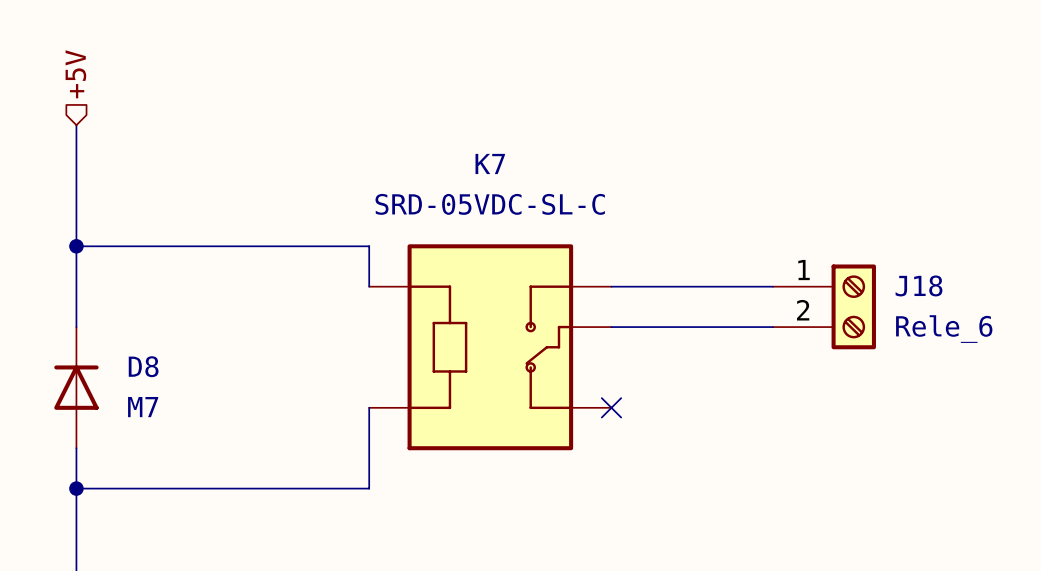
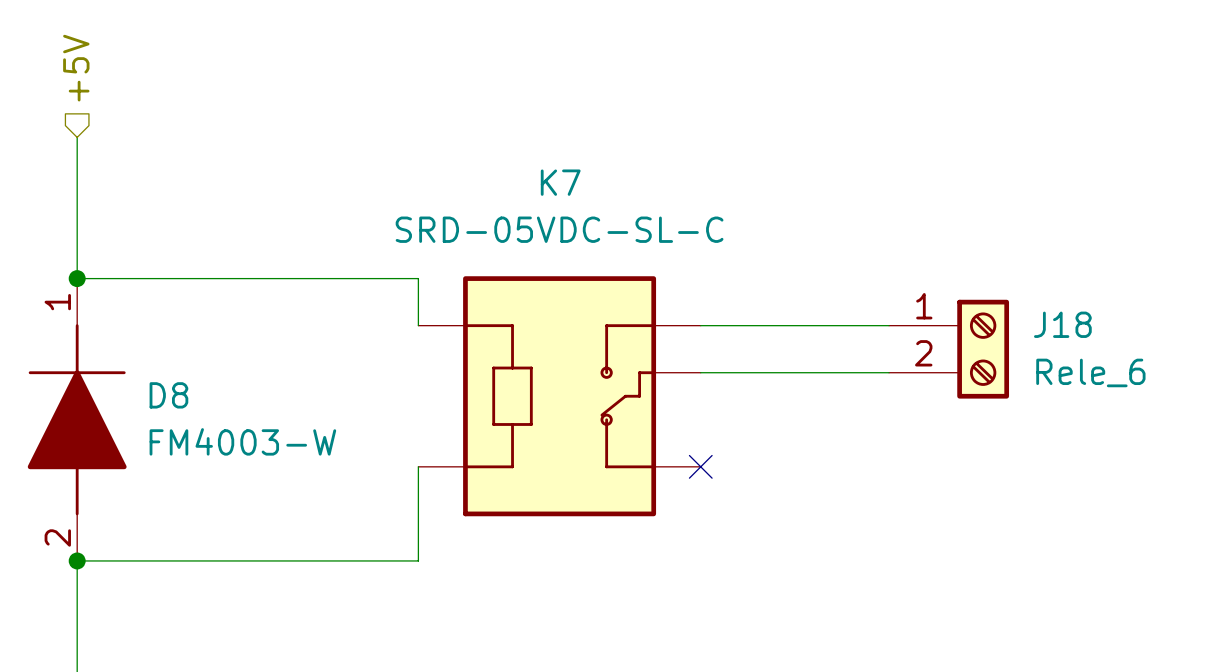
D8 symbol: [54, 327, 99, 449] -> [27, 278, 127, 561]
D8 value: M7 (143, 407) -> FM4003-W (242, 441)

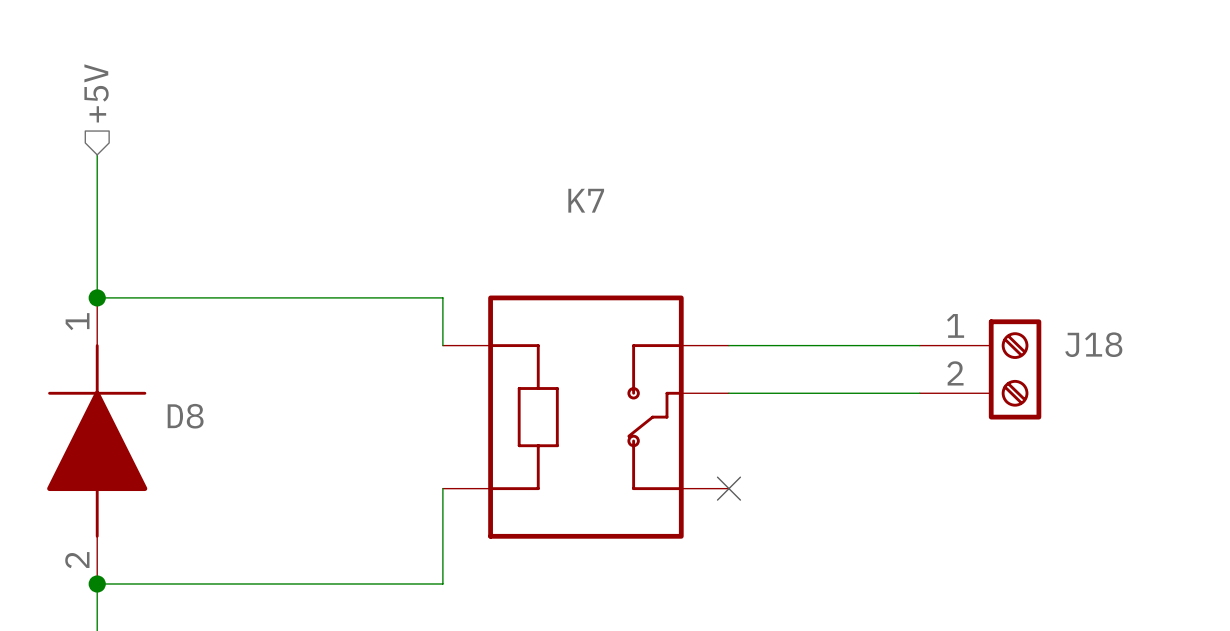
K7 value: SRD-05VDC-SL-C (559, 229) -> none
J18 value: Rele_6 (1090, 372) -> none
D8 value: FM4003-W (242, 441) -> none

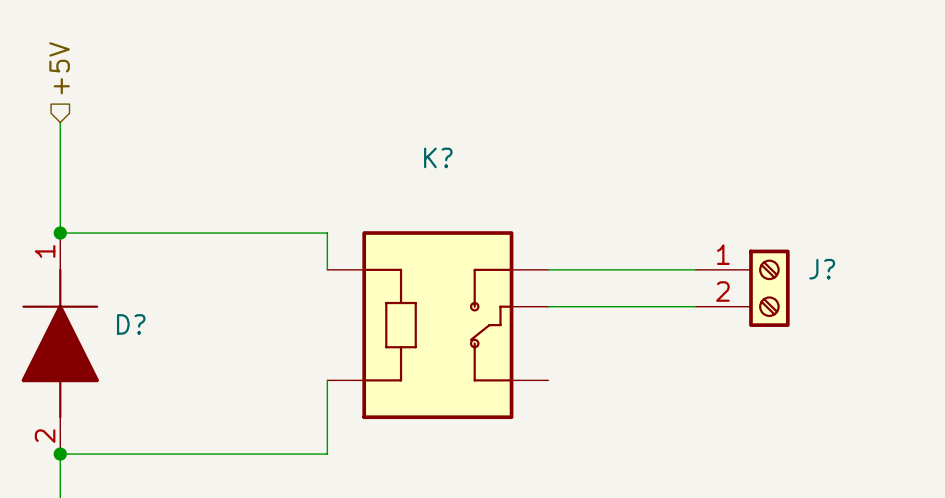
K7 name: K7 (586, 200) -> K? (438, 157)
J18 name: J18 (1093, 344) -> J? (822, 269)
D8 name: D8 (185, 416) -> D? (131, 324)
no-connect mark: (728, 488) -> none

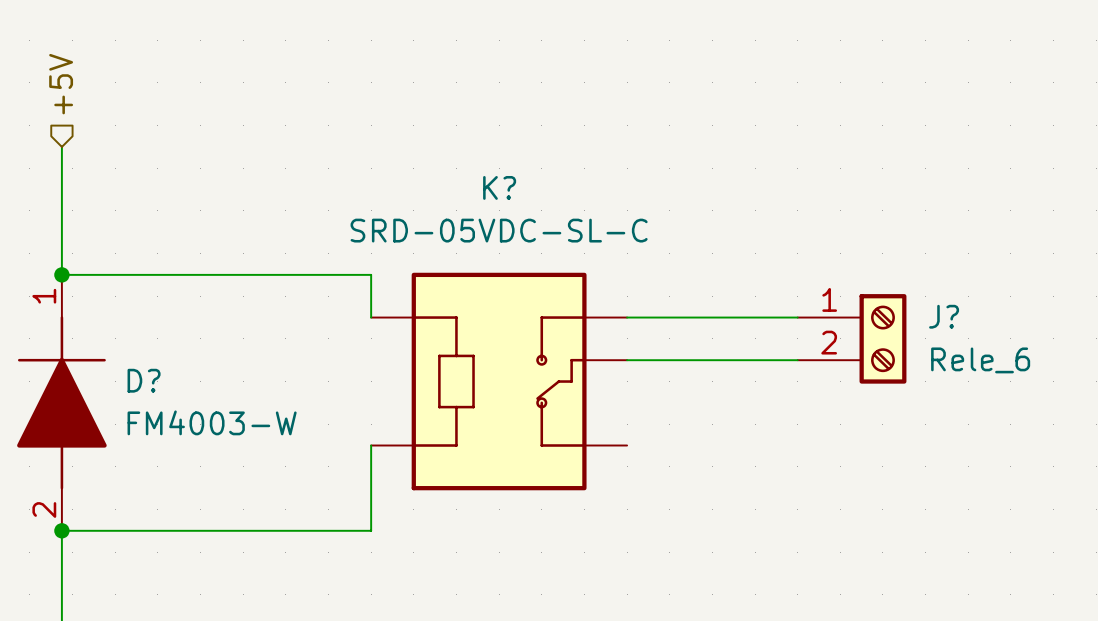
K? value: none -> SRD-05VDC-SL-C (499, 230)
J? value: none -> Rele_6 (980, 360)
D? value: none -> FM4003-W (212, 422)

